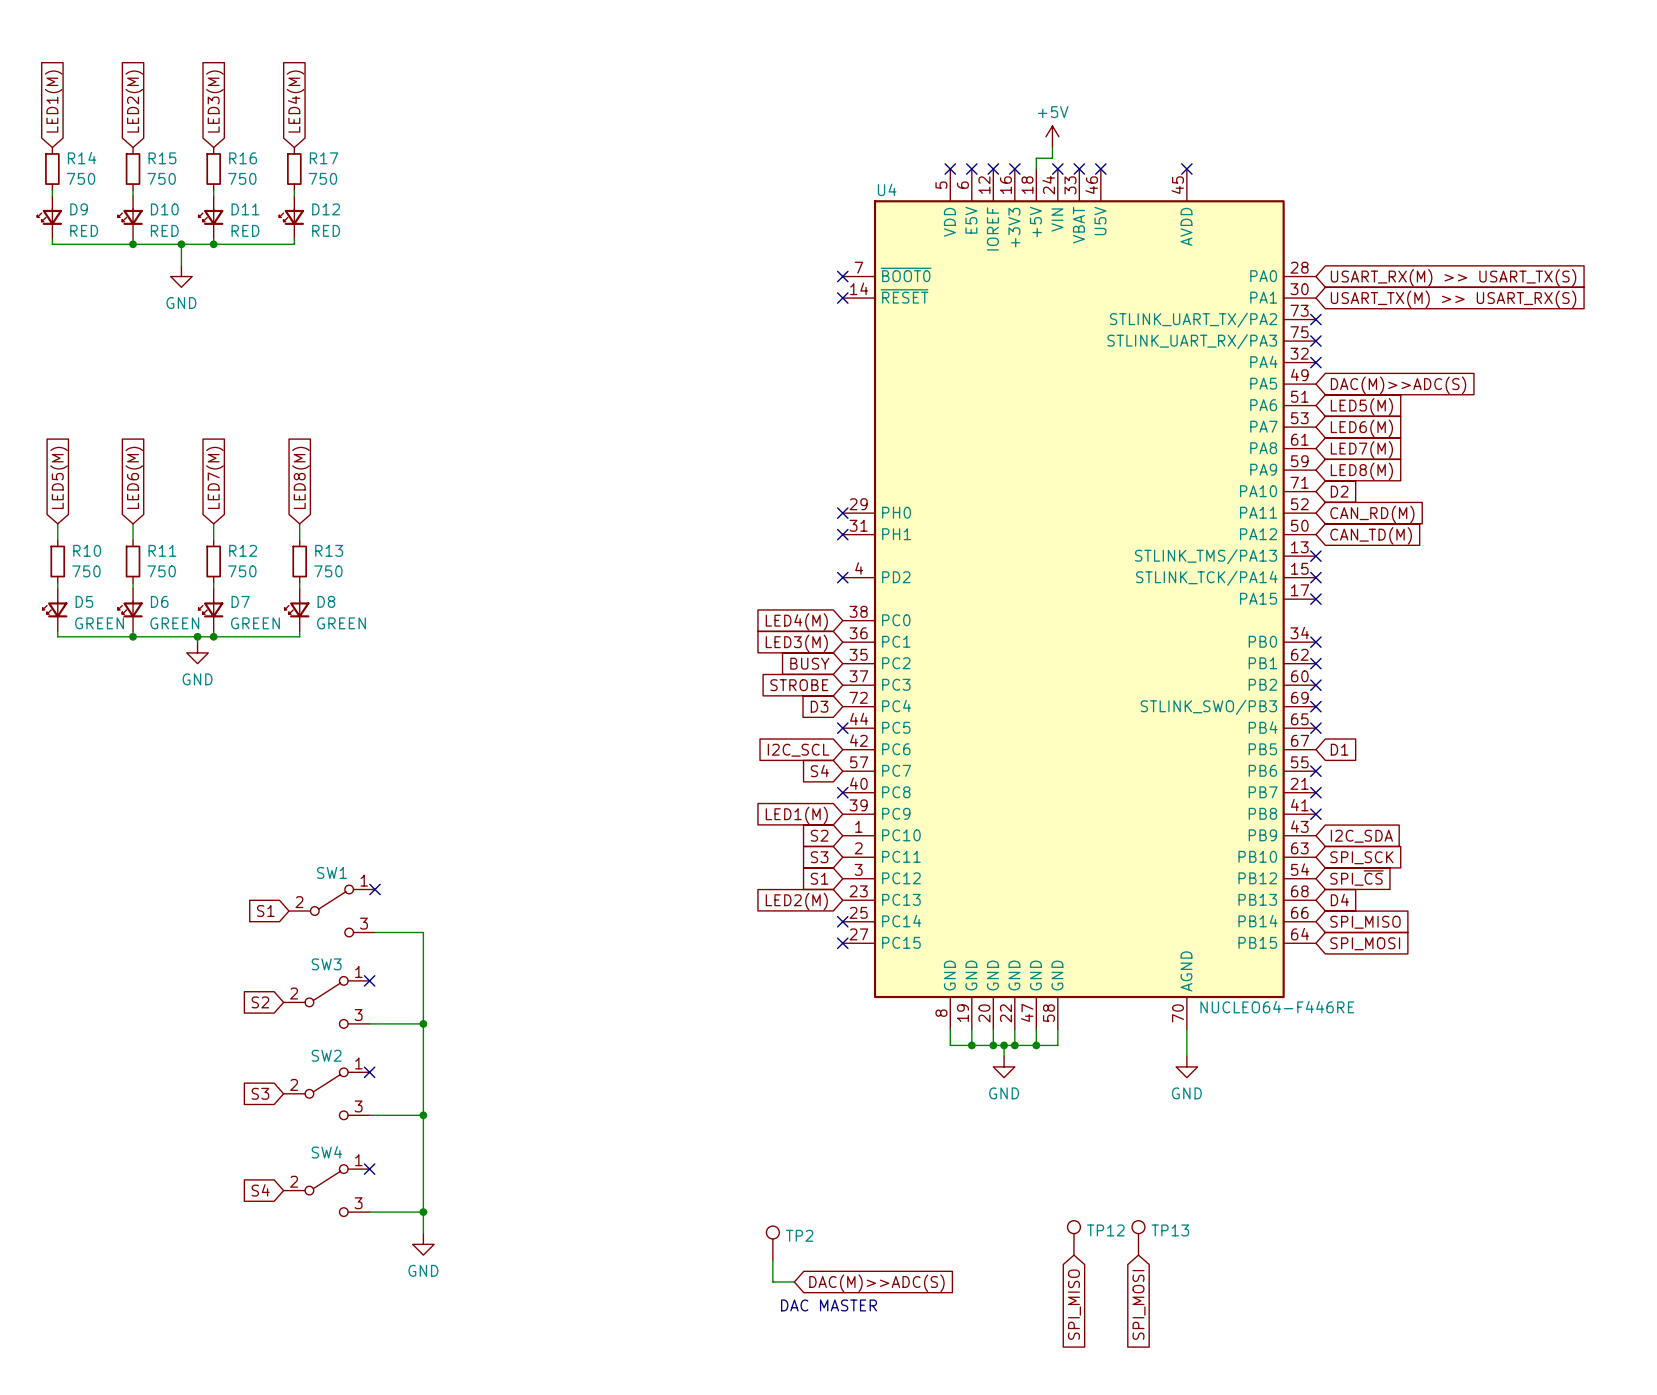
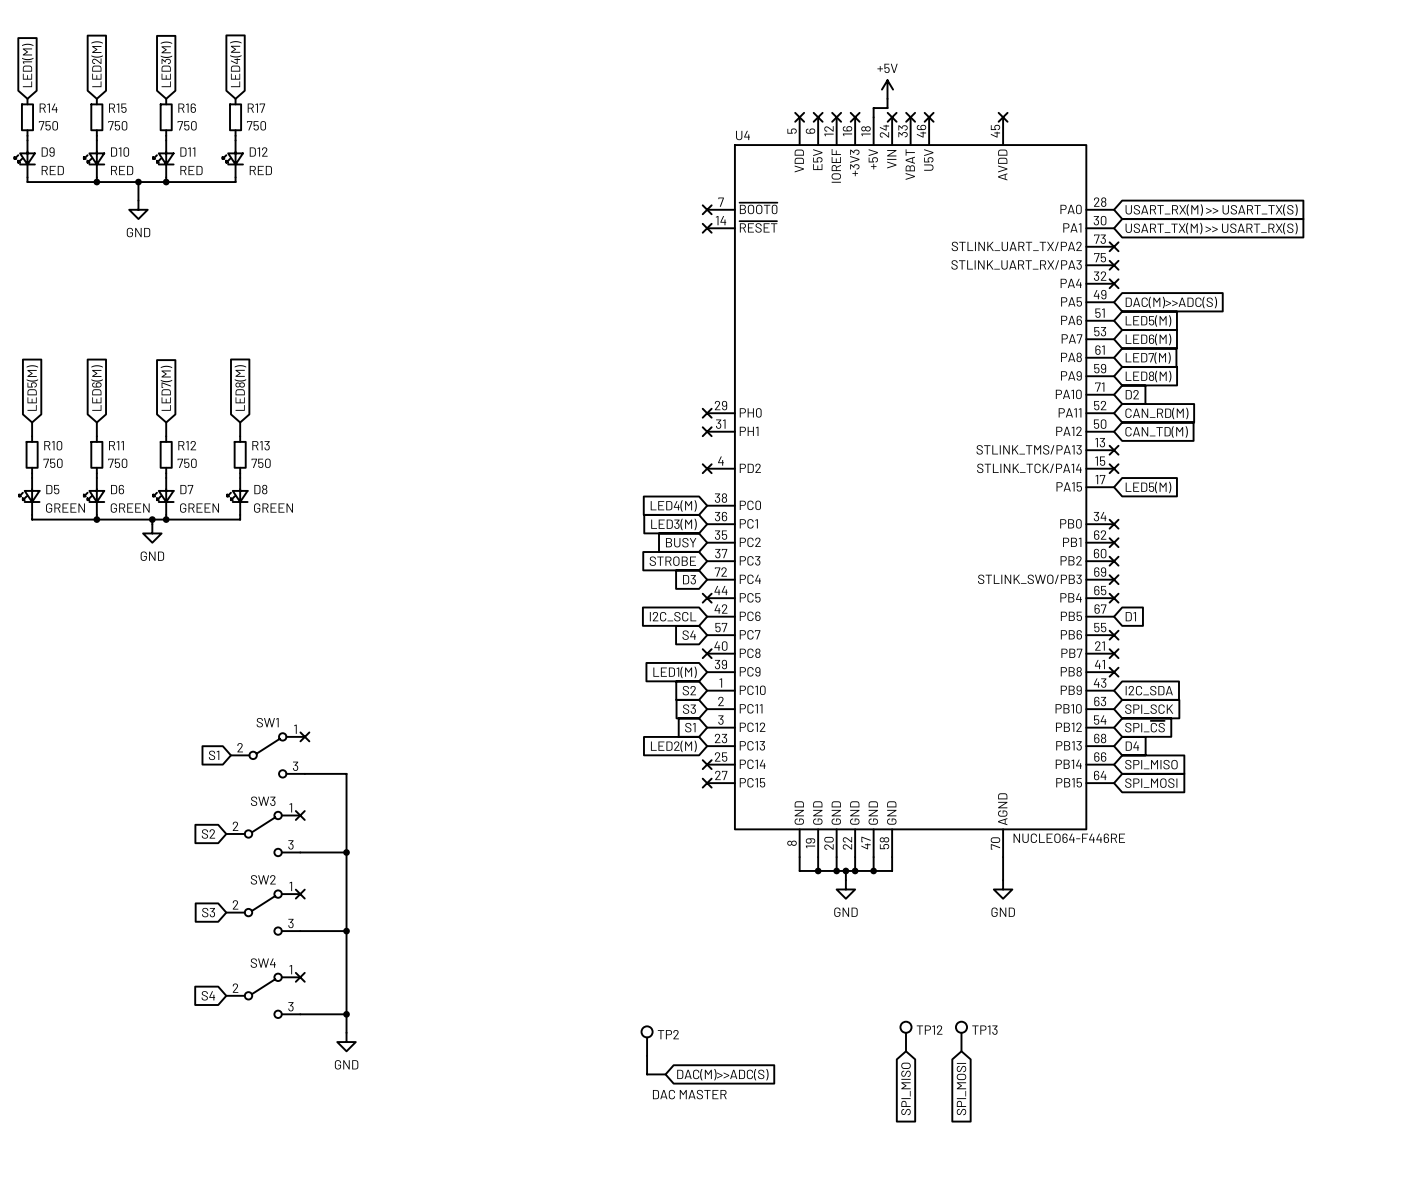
no-connect mark: (1315, 599) -> none
global label: none -> LED5(M) (1148, 487)

